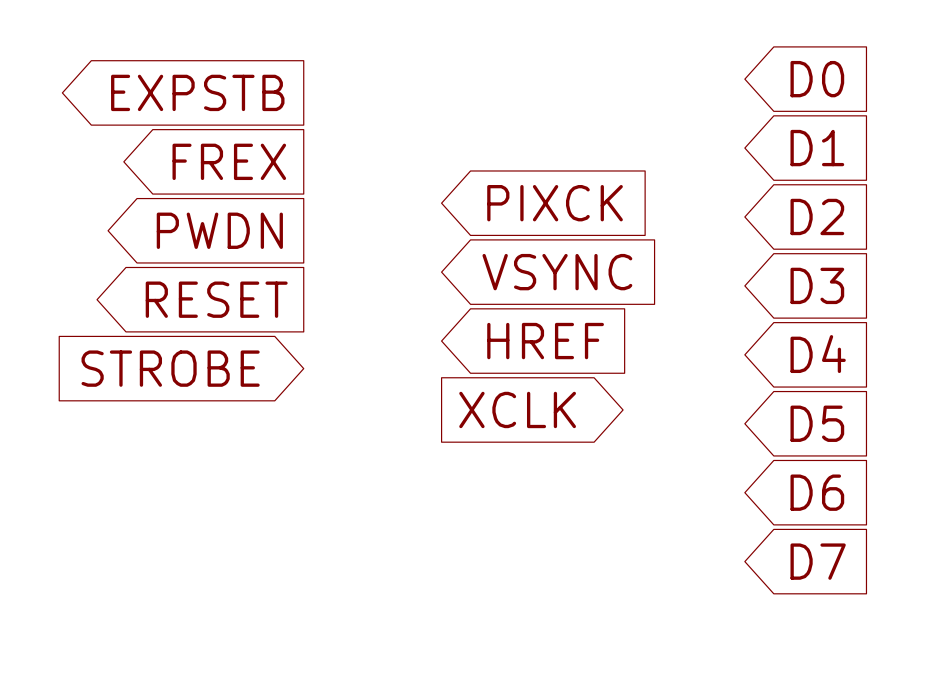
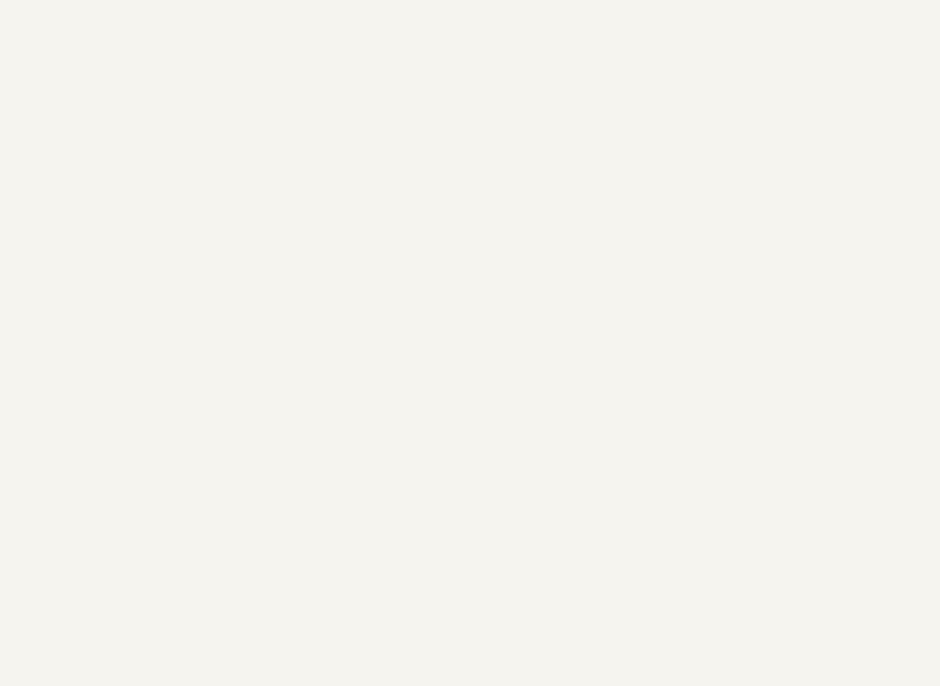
global label: D0 (817, 79) -> none
global label: EXPSTB (197, 92) -> none
global label: D1 (817, 148) -> none
global label: FREX (229, 161) -> none
global label: PIXCK (555, 203) -> none
global label: D2 (817, 216) -> none
global label: PWDN (219, 230) -> none
global label: VSYNC (557, 272) -> none
global label: D3 (817, 285) -> none
global label: RESET (216, 299) -> none
global label: HREF (545, 341) -> none
global label: D4 (818, 354) -> none
global label: STROBE (170, 368) -> none
global label: XCLK (517, 409) -> none
global label: D5 (817, 423) -> none
global label: D6 (817, 492) -> none
global label: D7 (818, 561) -> none

